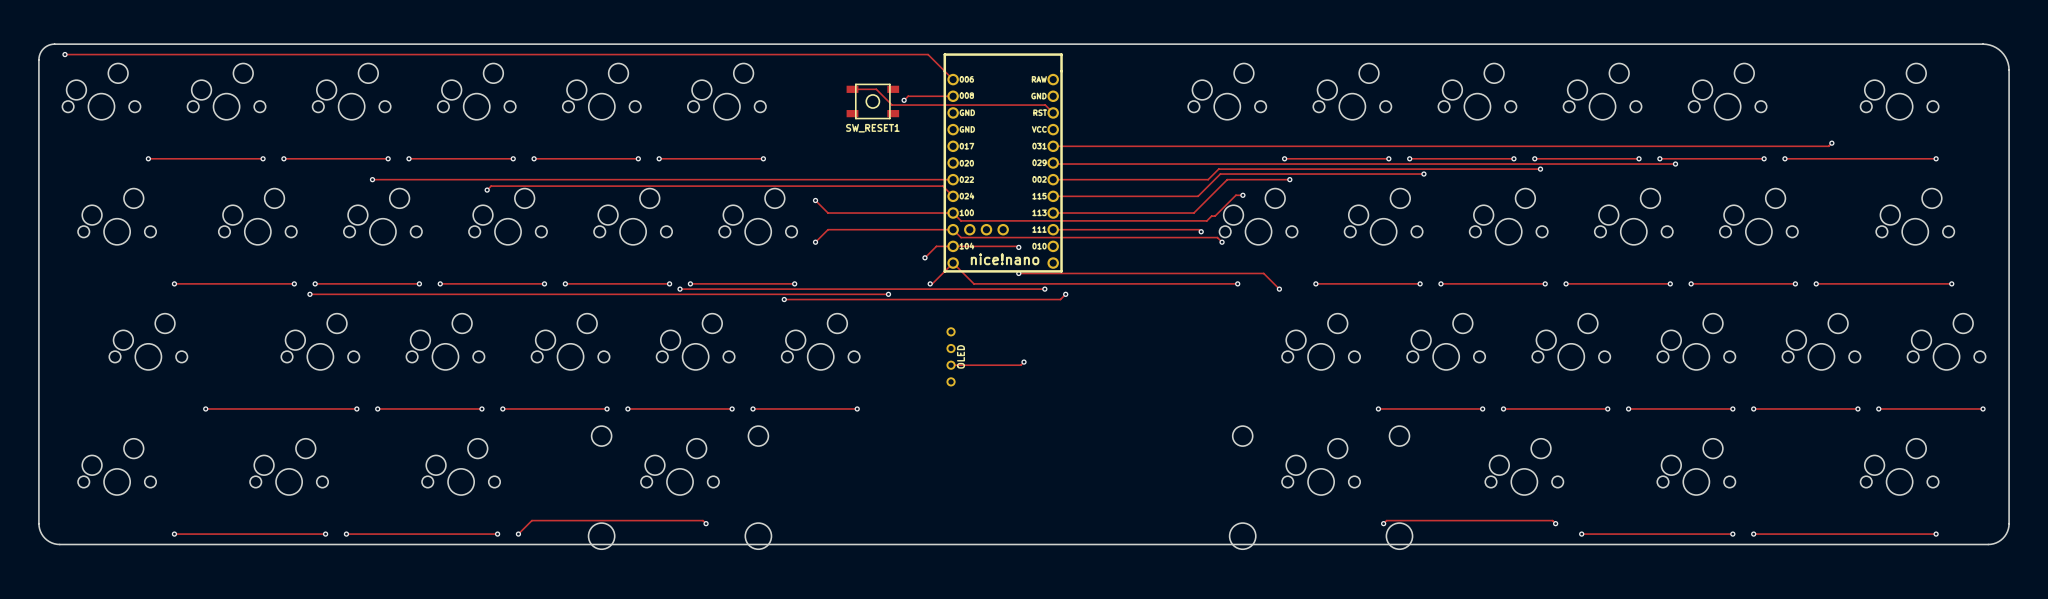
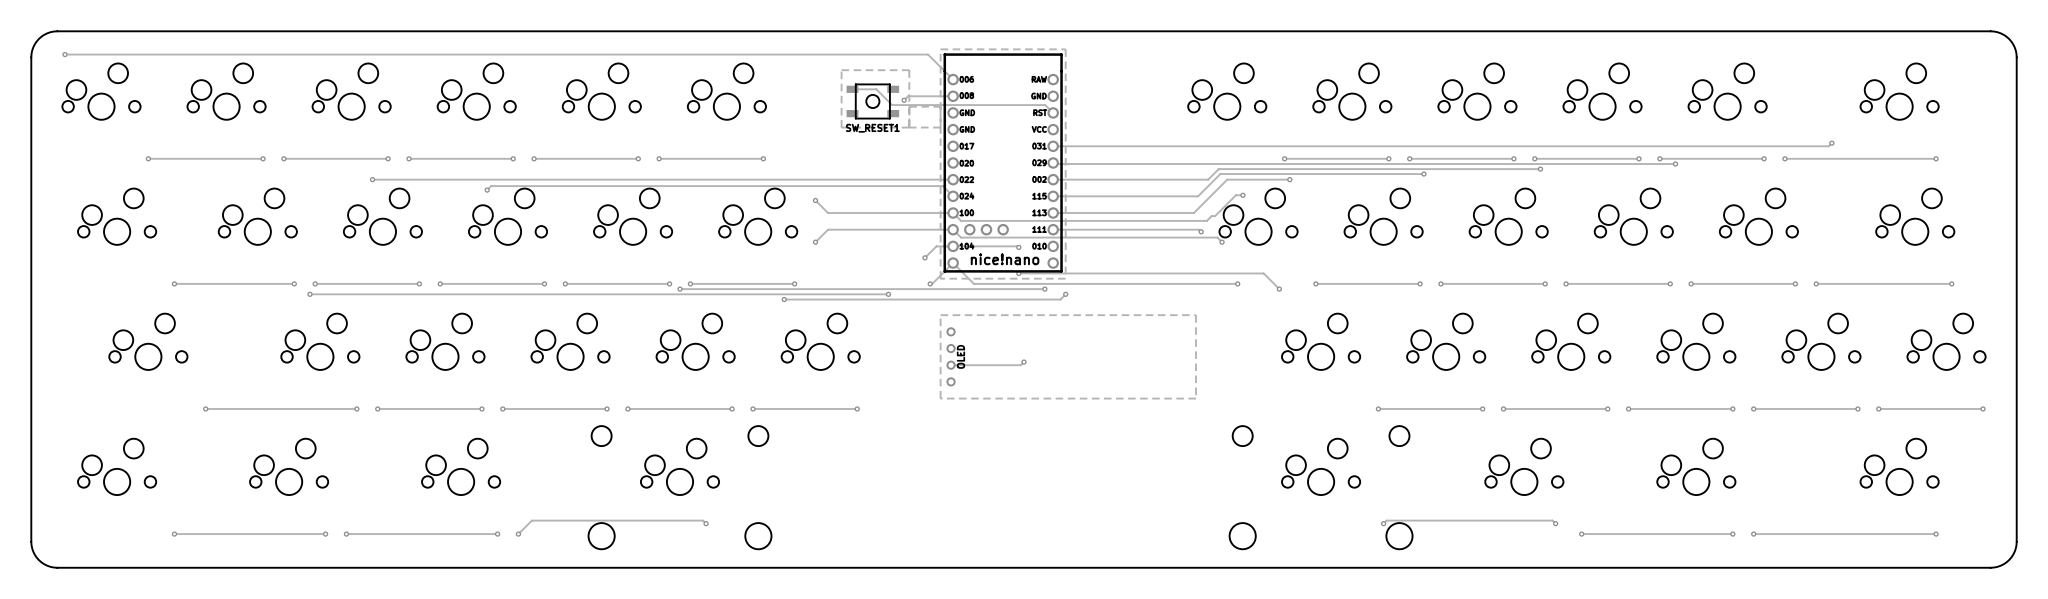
board edge: (54, 44) (1989, 45) (2003, 54) (2009, 70) (2008, 529) (2000, 540) (1988, 544) (54, 543) (43, 536) (38, 523) (38, 59) (43, 48) (54, 44) -> (57, 31) (47, 33) (38, 38) (33, 47) (31, 57) (31, 541) (36, 557) (50, 566) (1990, 567) (2006, 562) (2015, 548) (2016, 57) (2011, 41) (1997, 32) (57, 31)
zone outline: none -> (940, 49) (940, 278) (1065, 278) (1065, 49) (940, 49)
zone outline: none -> (909, 106) (940, 106)
zone outline: none -> (909, 127) (909, 70) (841, 70) (841, 127) (940, 127)
zone outline: none -> (940, 315) (940, 398) (1196, 398) (1196, 315) (940, 315)

